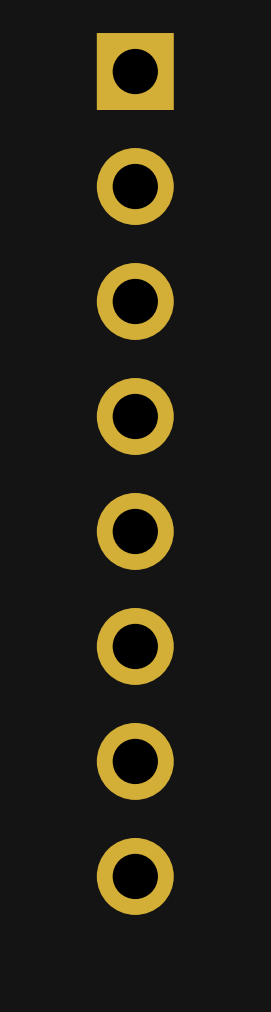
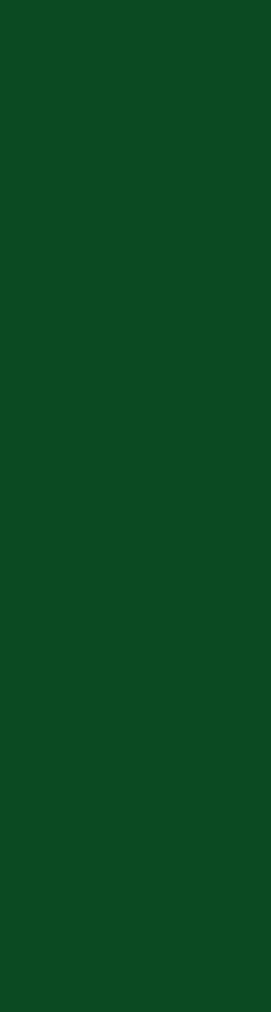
part: (135, 473) -> none

